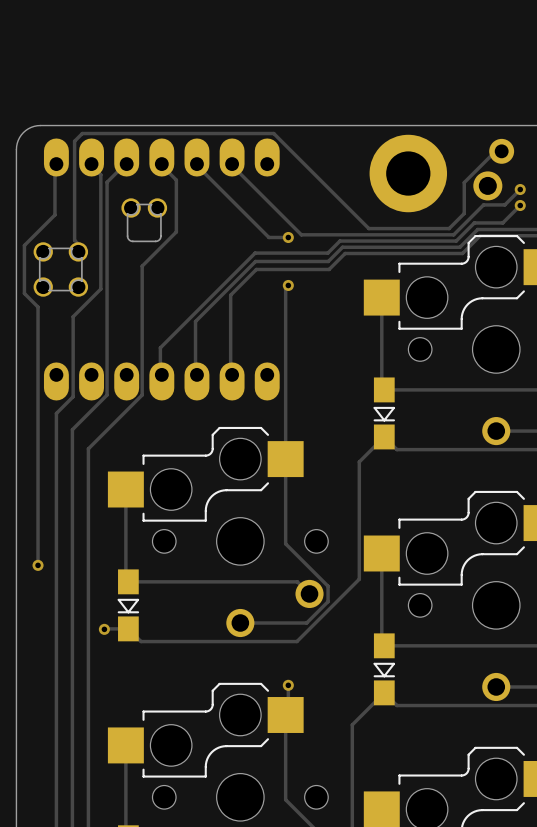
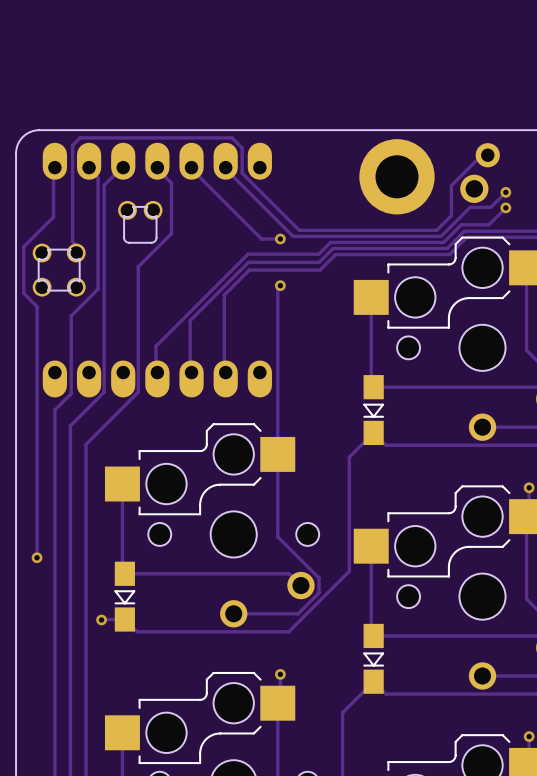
track: (238, 133) (273, 133) (368, 228) -> (232, 137) (242, 148) (242, 173) (299, 230) (358, 230)

